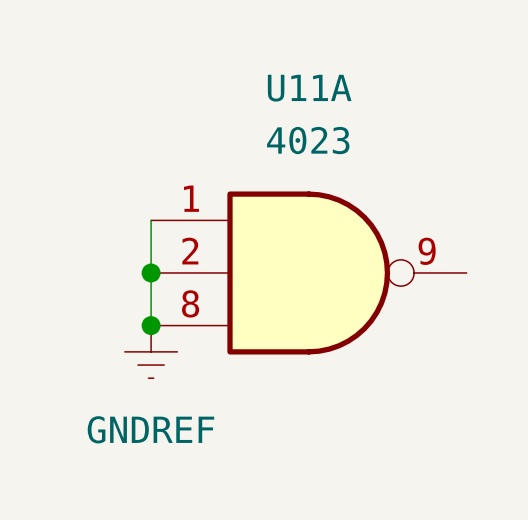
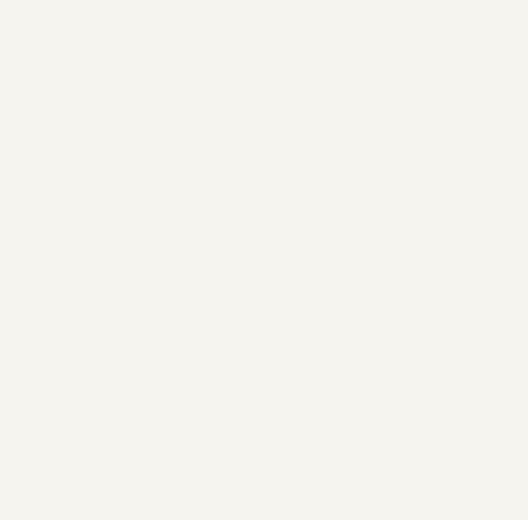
wire: (151, 220) (151, 325) -> none
junction: (151, 272) -> none
U11A: 4023 (308, 272) -> none
junction: (151, 325) -> none
power symbol: GNDREF (151, 351) -> none

